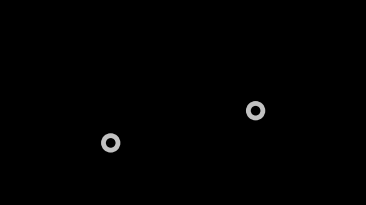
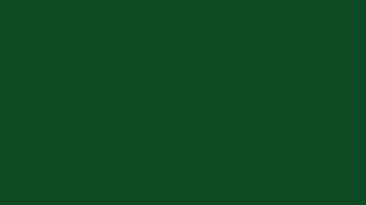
via: (255, 110) -> none
via: (110, 142) -> none

